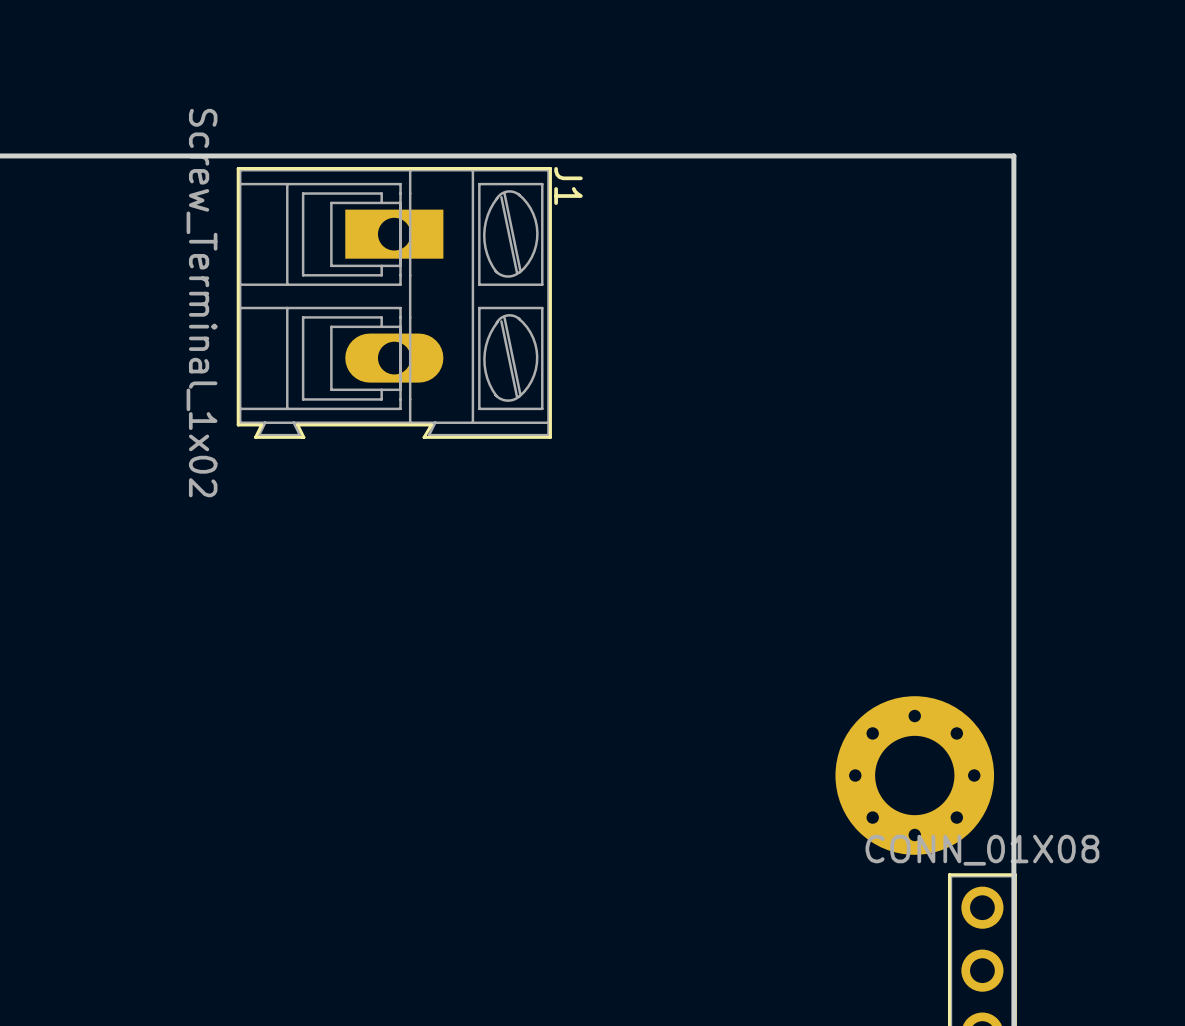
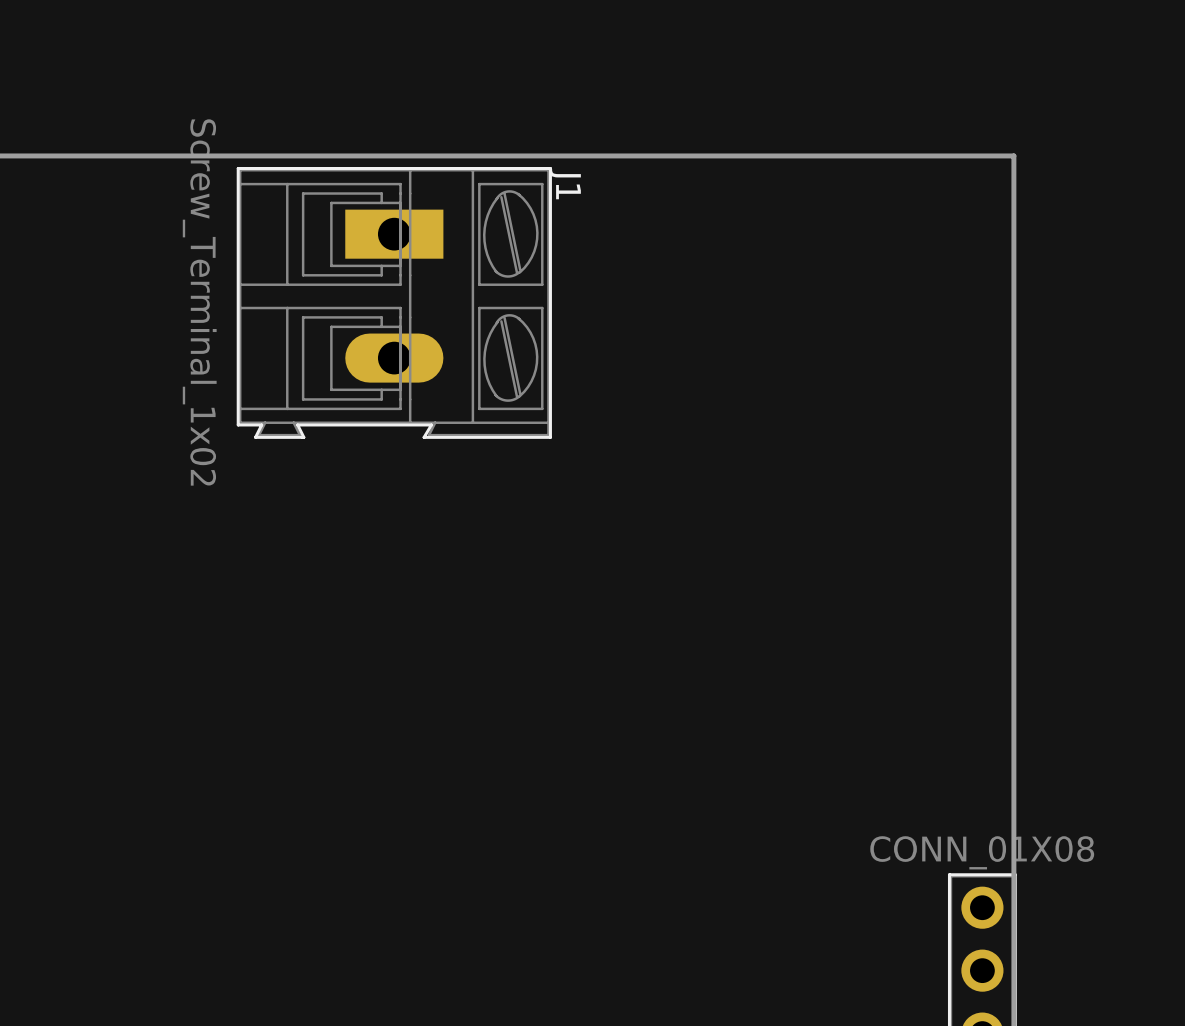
part: (914, 775) -> none

